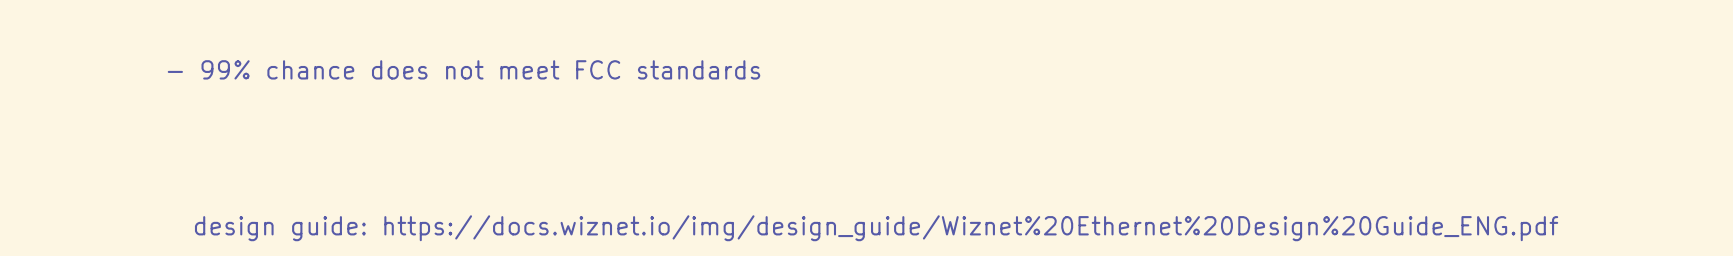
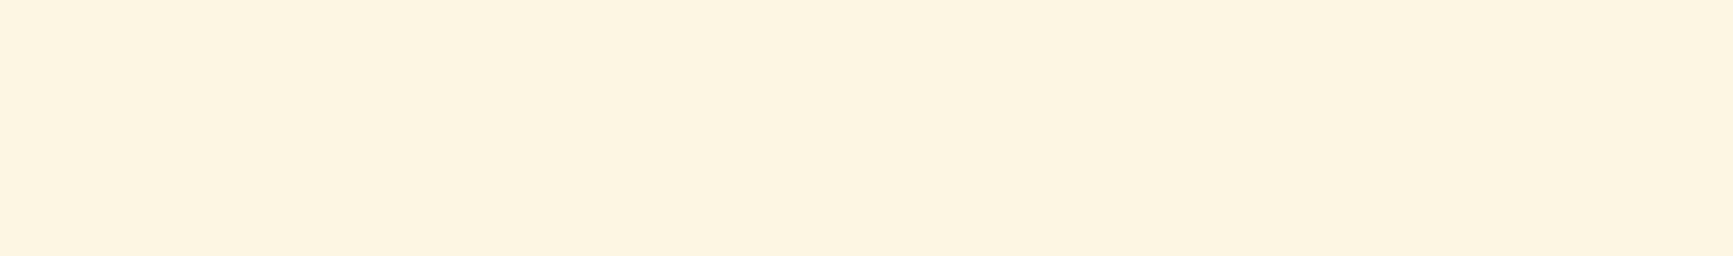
text: - 99% chance does not meet FCC standards (463, 69) -> none
text: design guide: https://docs.wiznet.io/img/design_guide/Wiznet%20Ethernet%20Design%20Guide_ENG.pdf (876, 228) -> none

